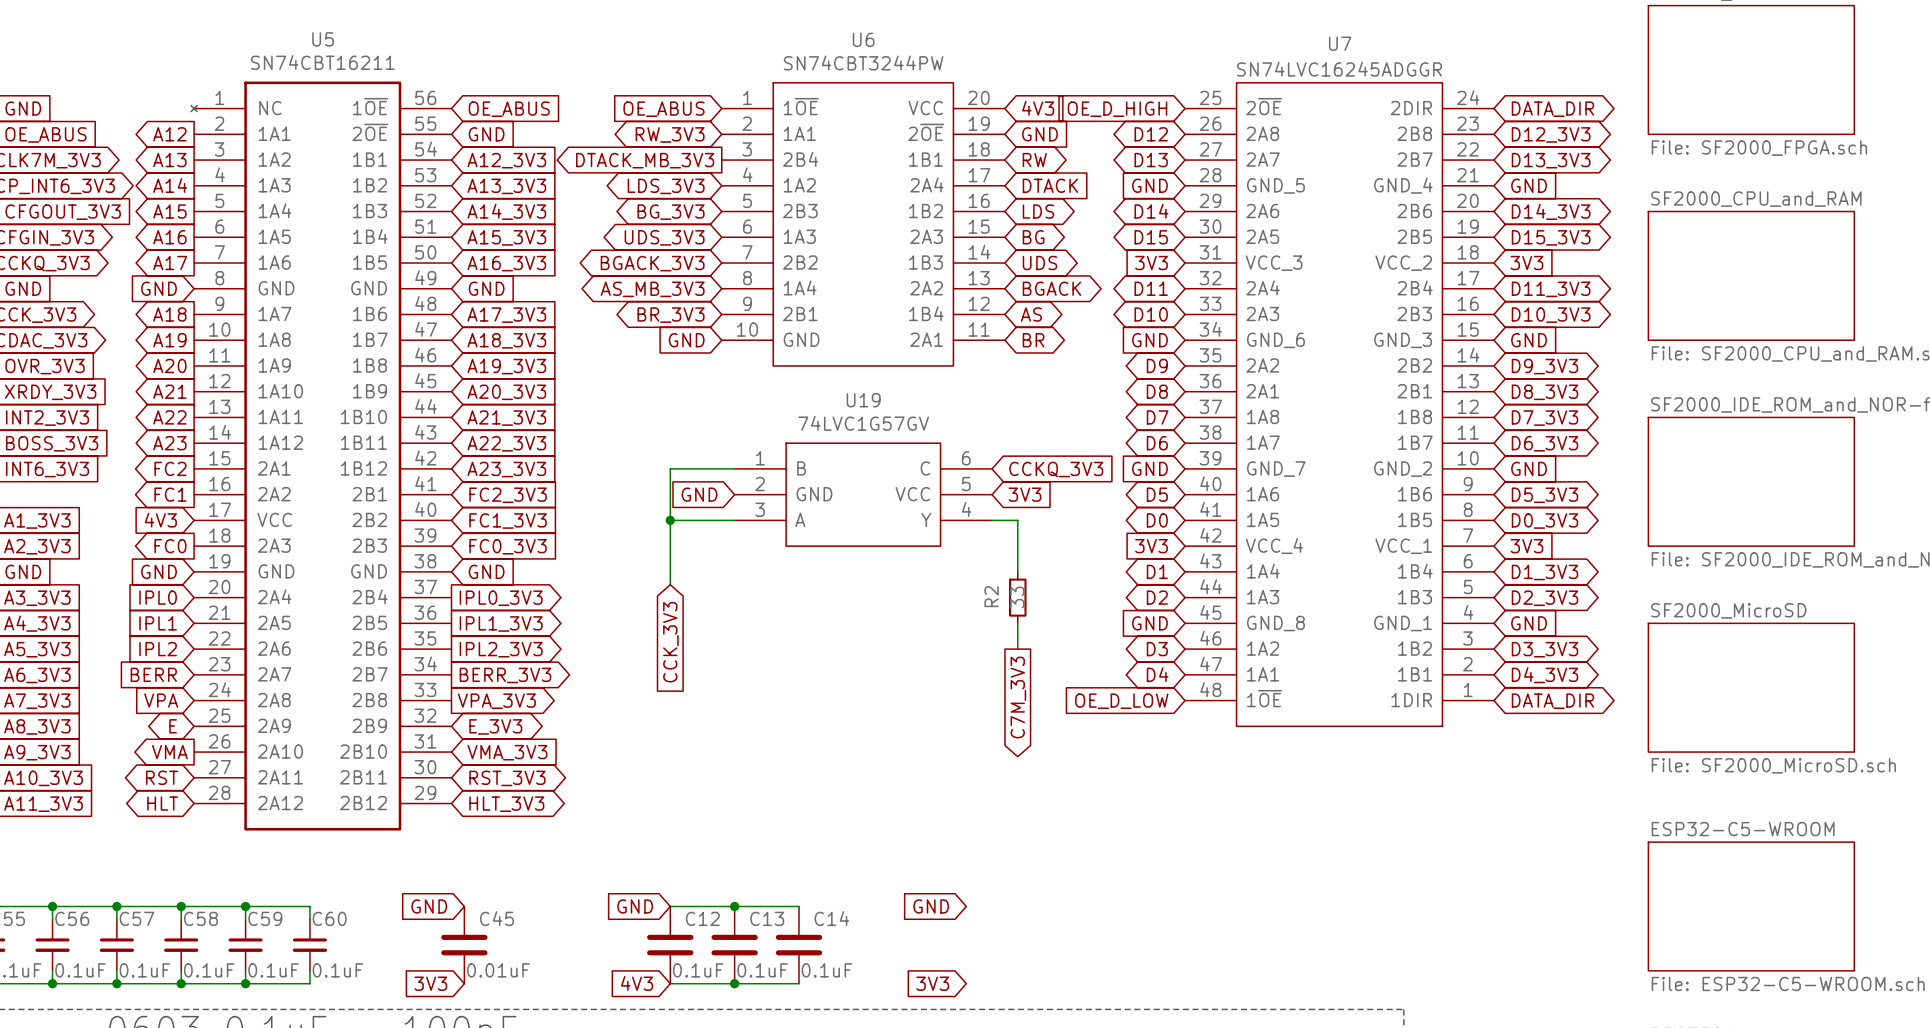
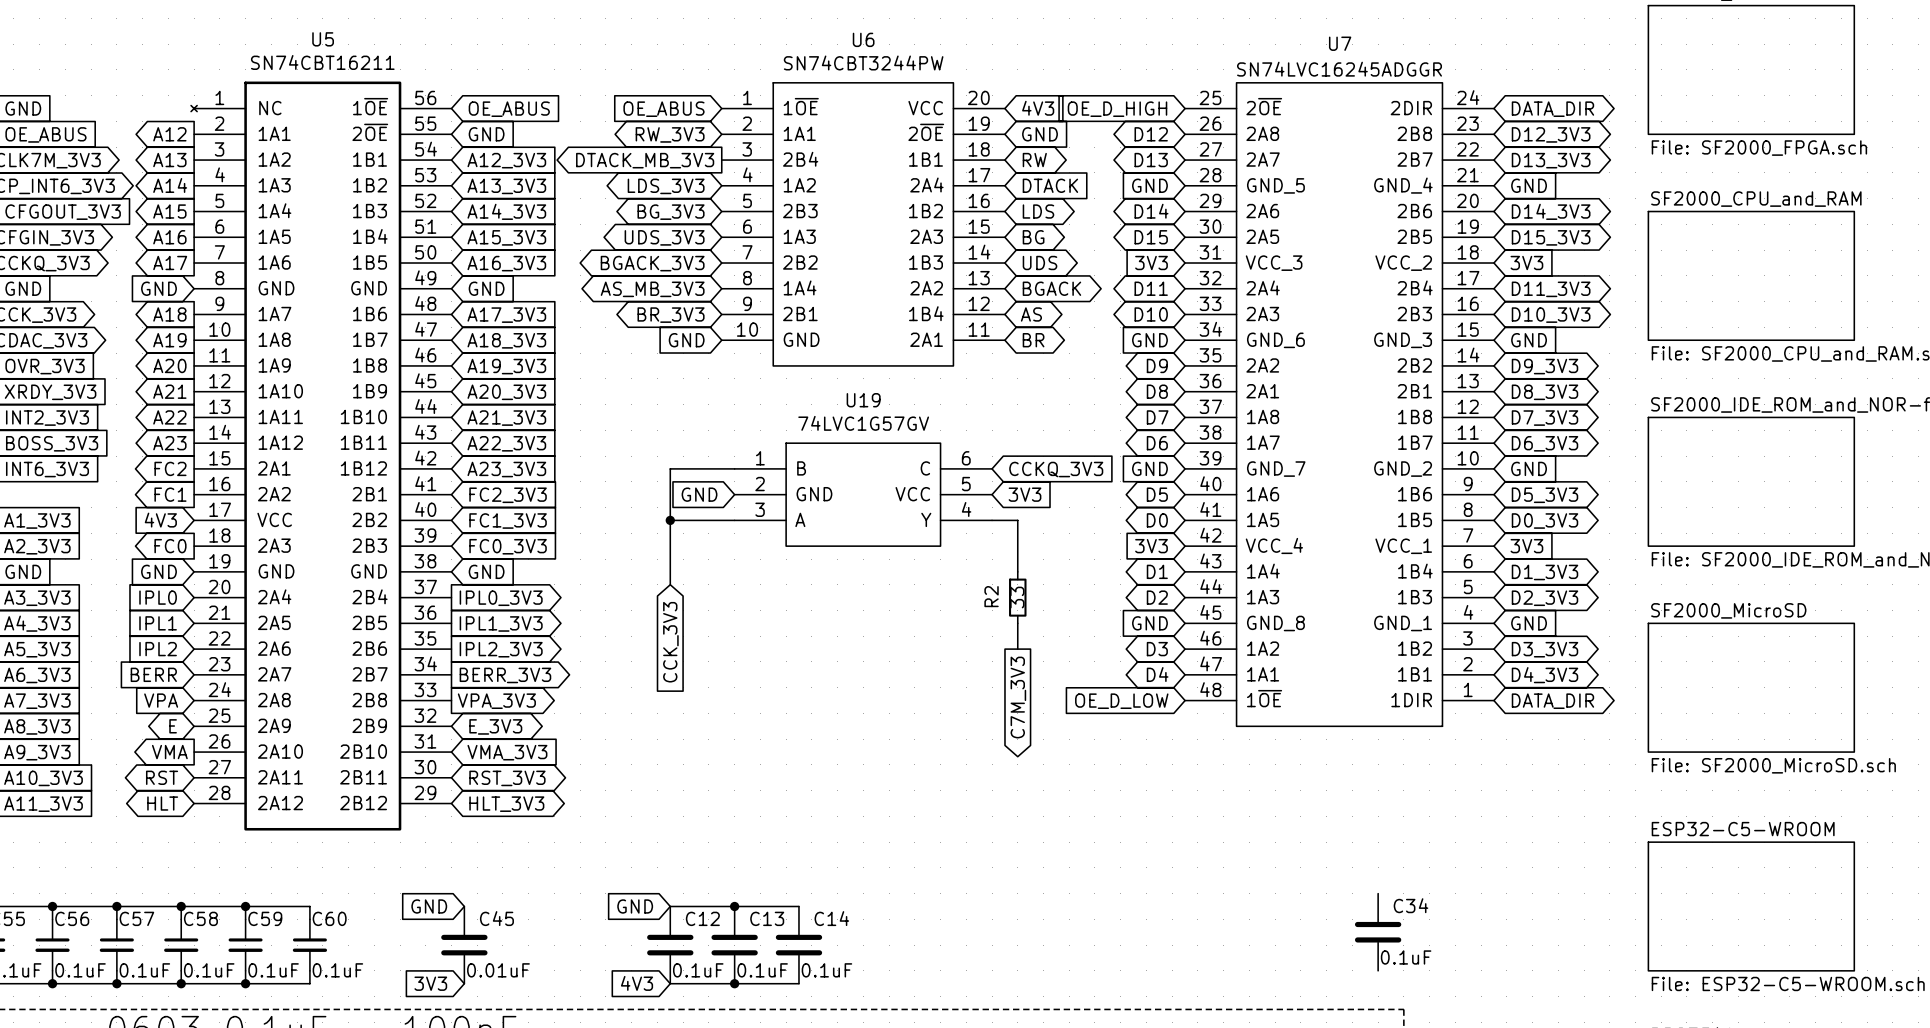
global label: GND (931, 906) -> none
C34: none -> 0.1uF (1378, 932)
global label: 3V3 (932, 983) -> none

